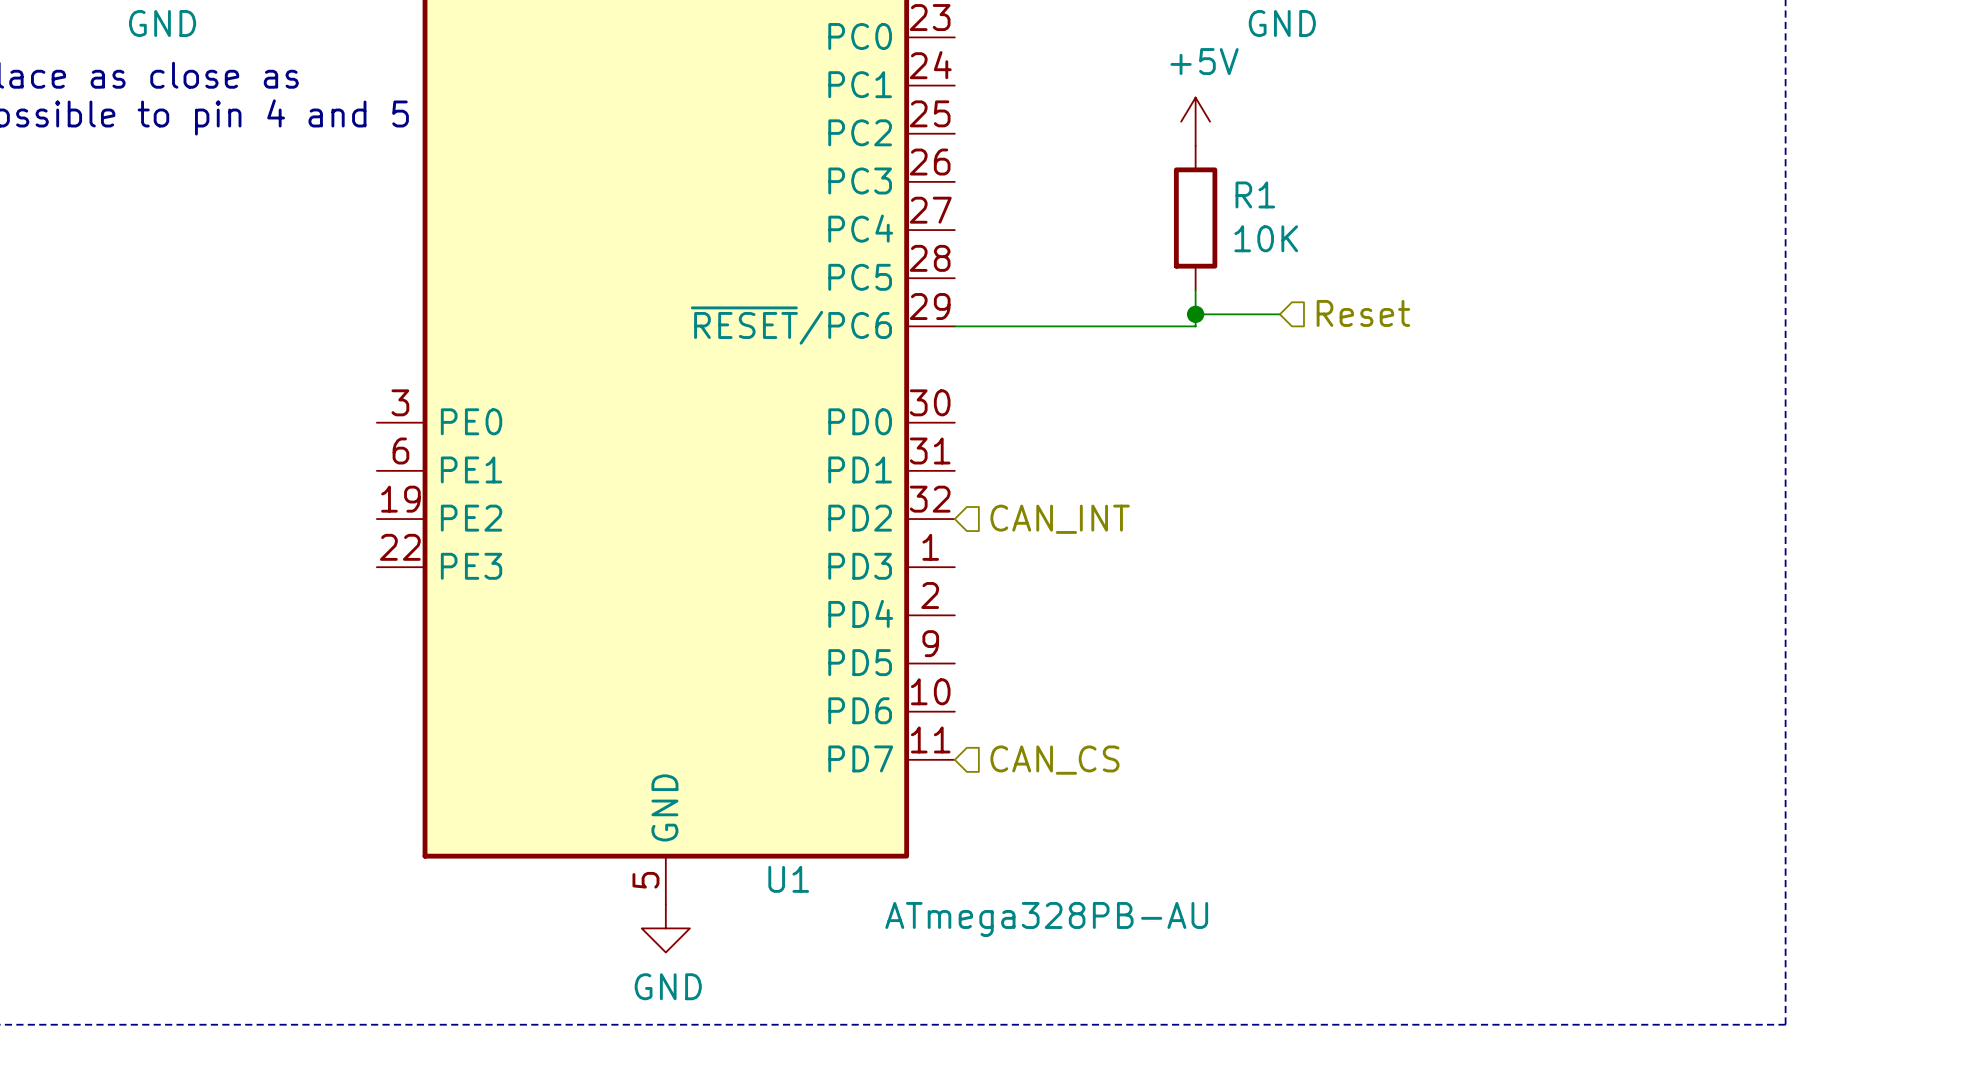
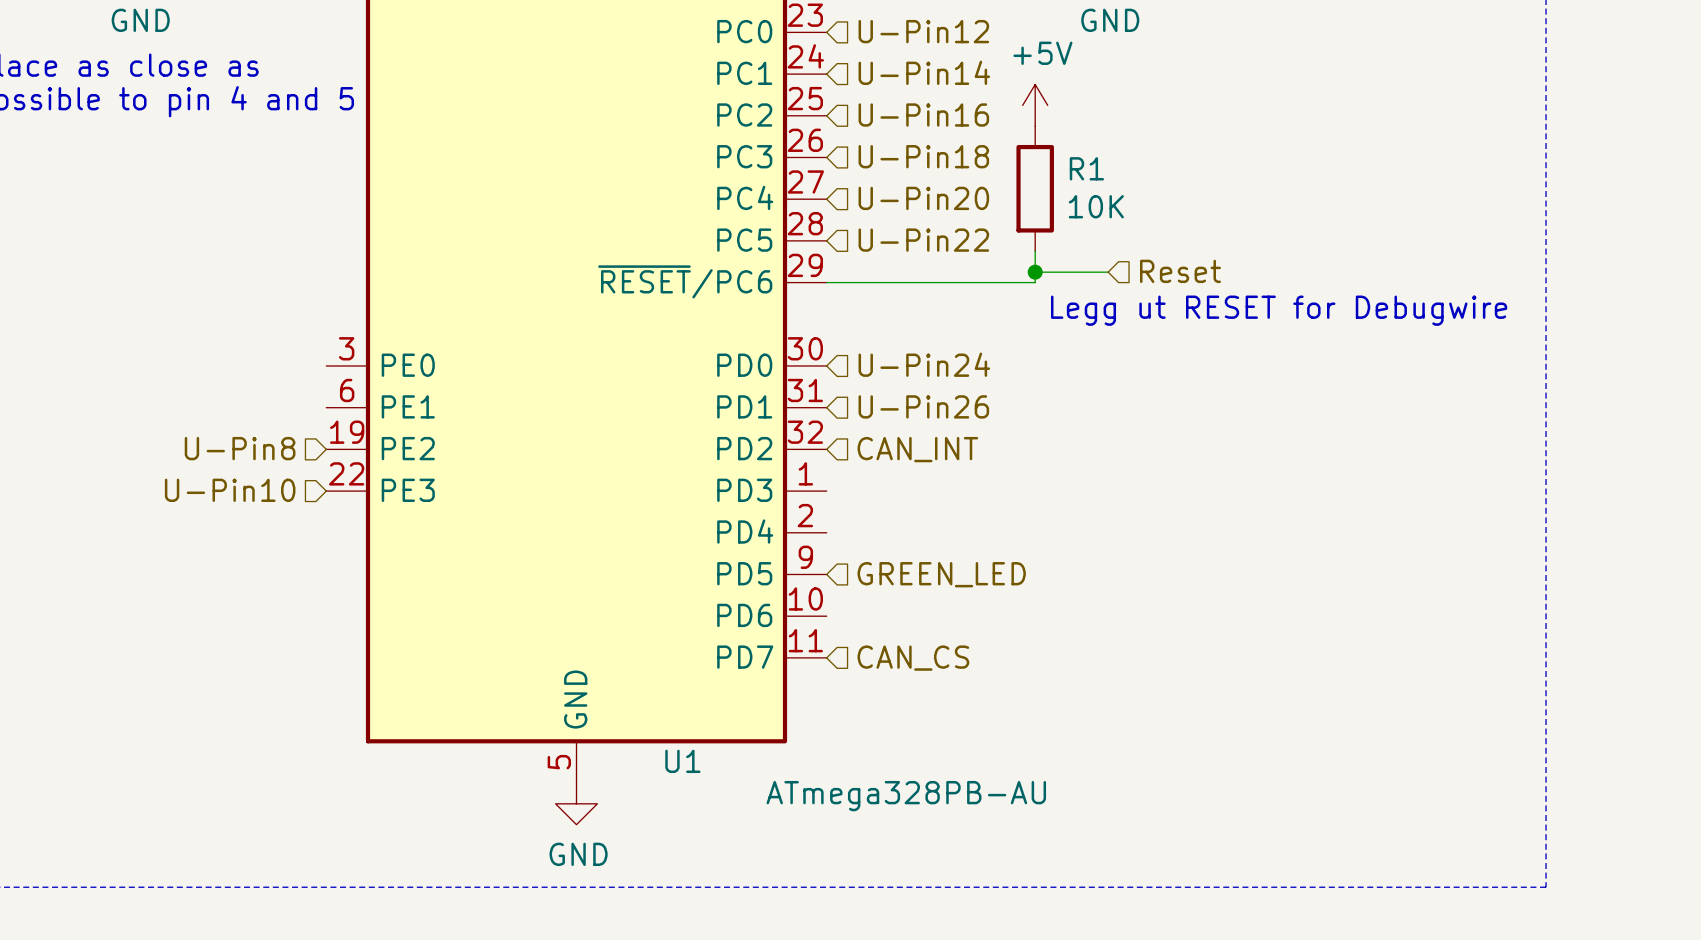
hierarchical label: none -> U-Pin12 (923, 31)
hierarchical label: none -> U-Pin14 (924, 72)
hierarchical label: none -> U-Pin16 (923, 115)
hierarchical label: none -> U-Pin18 (923, 156)
hierarchical label: none -> U-Pin20 (923, 198)
hierarchical label: none -> U-Pin22 (923, 240)
text: none -> Legg ut RESET for Debugwire (1279, 310)
hierarchical label: none -> U-Pin24 (924, 364)
hierarchical label: none -> U-Pin26 (923, 406)
hierarchical label: none -> U-Pin8 (240, 448)
hierarchical label: none -> U-Pin10 (230, 490)
hierarchical label: none -> GREEN_LED (941, 574)

